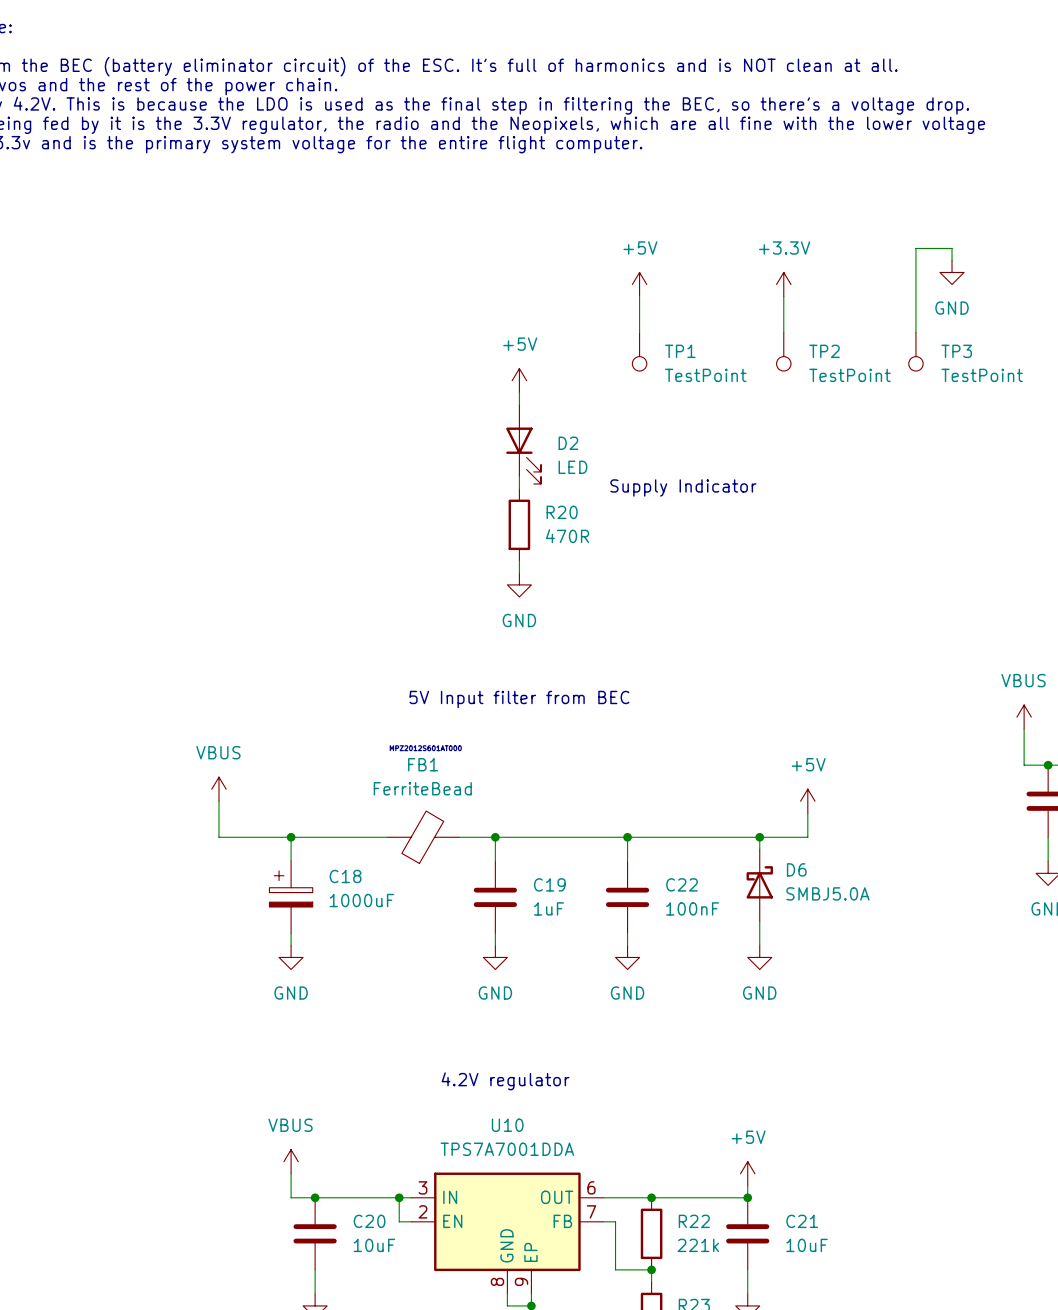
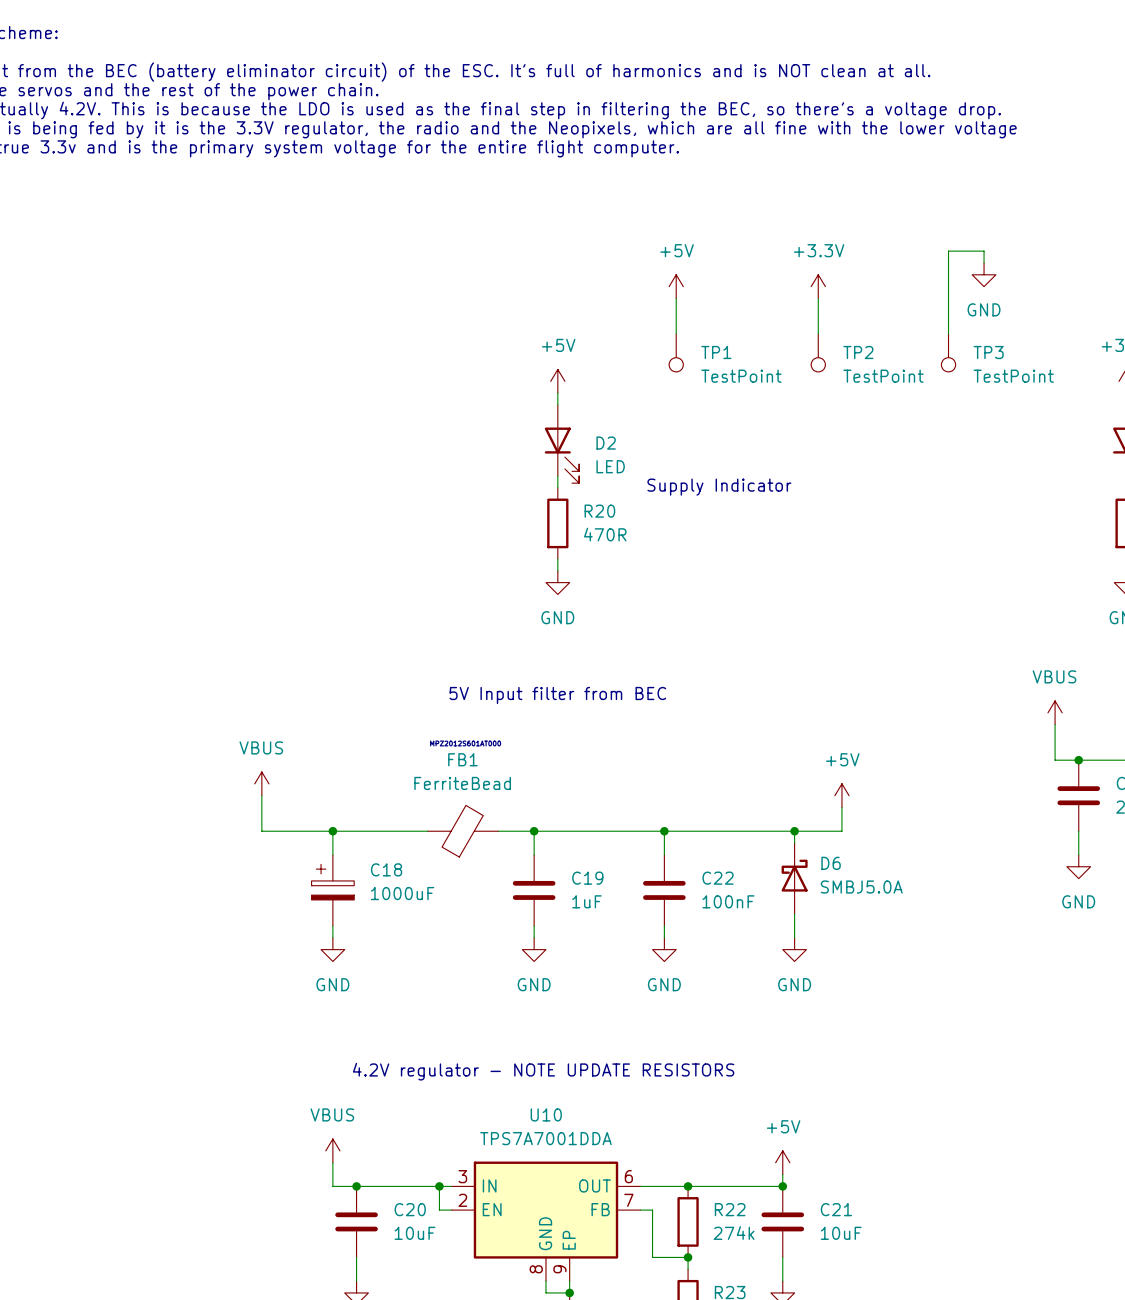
text: 4.2V regulator (505, 1081) -> 4.2V regulator - NOTE UPDATE RESISTORS (543, 1071)
R22 value: 221k (698, 1245) -> 274k (734, 1233)

